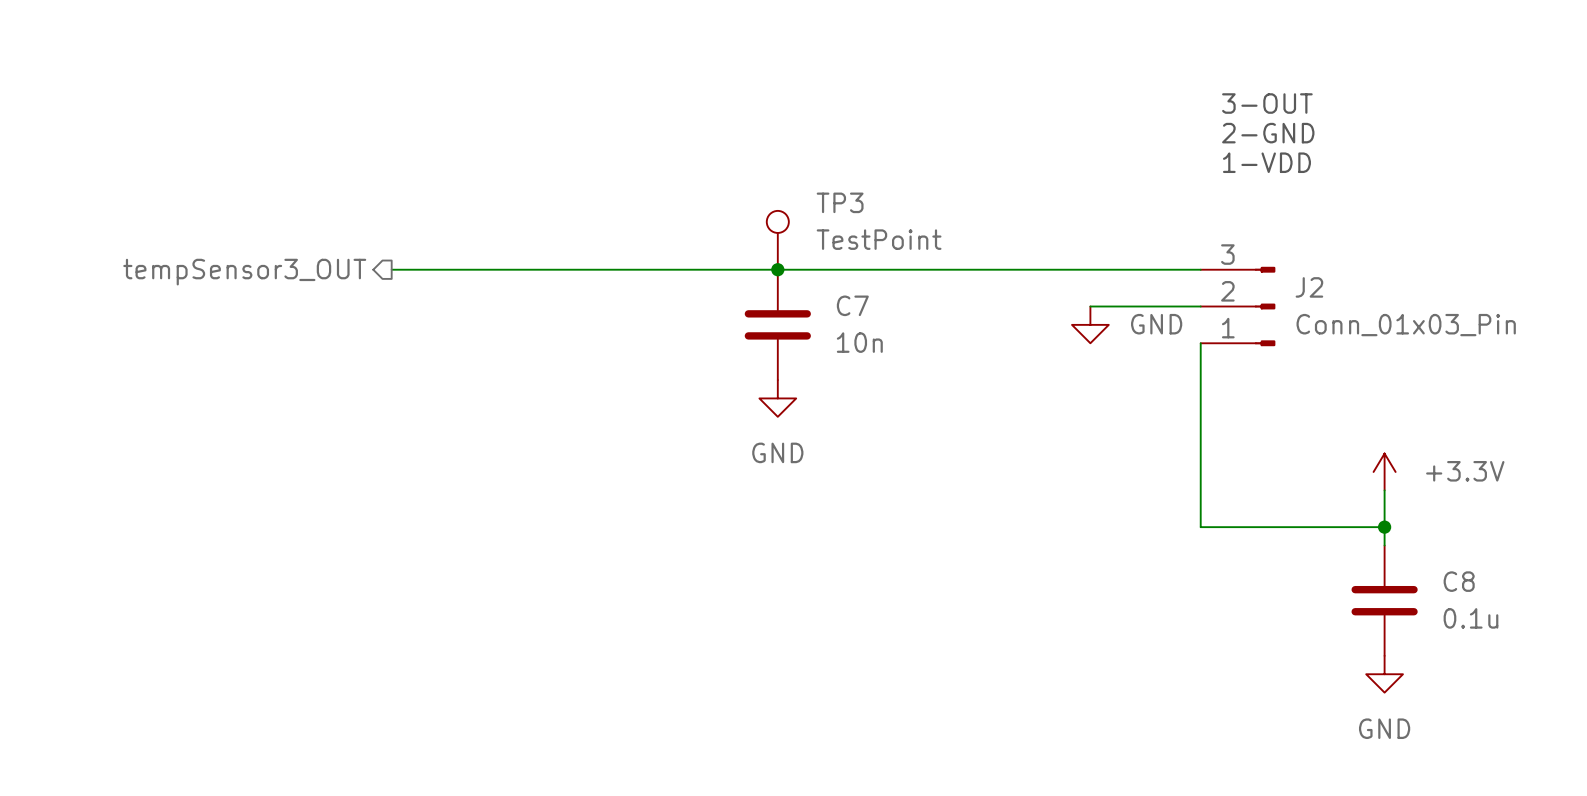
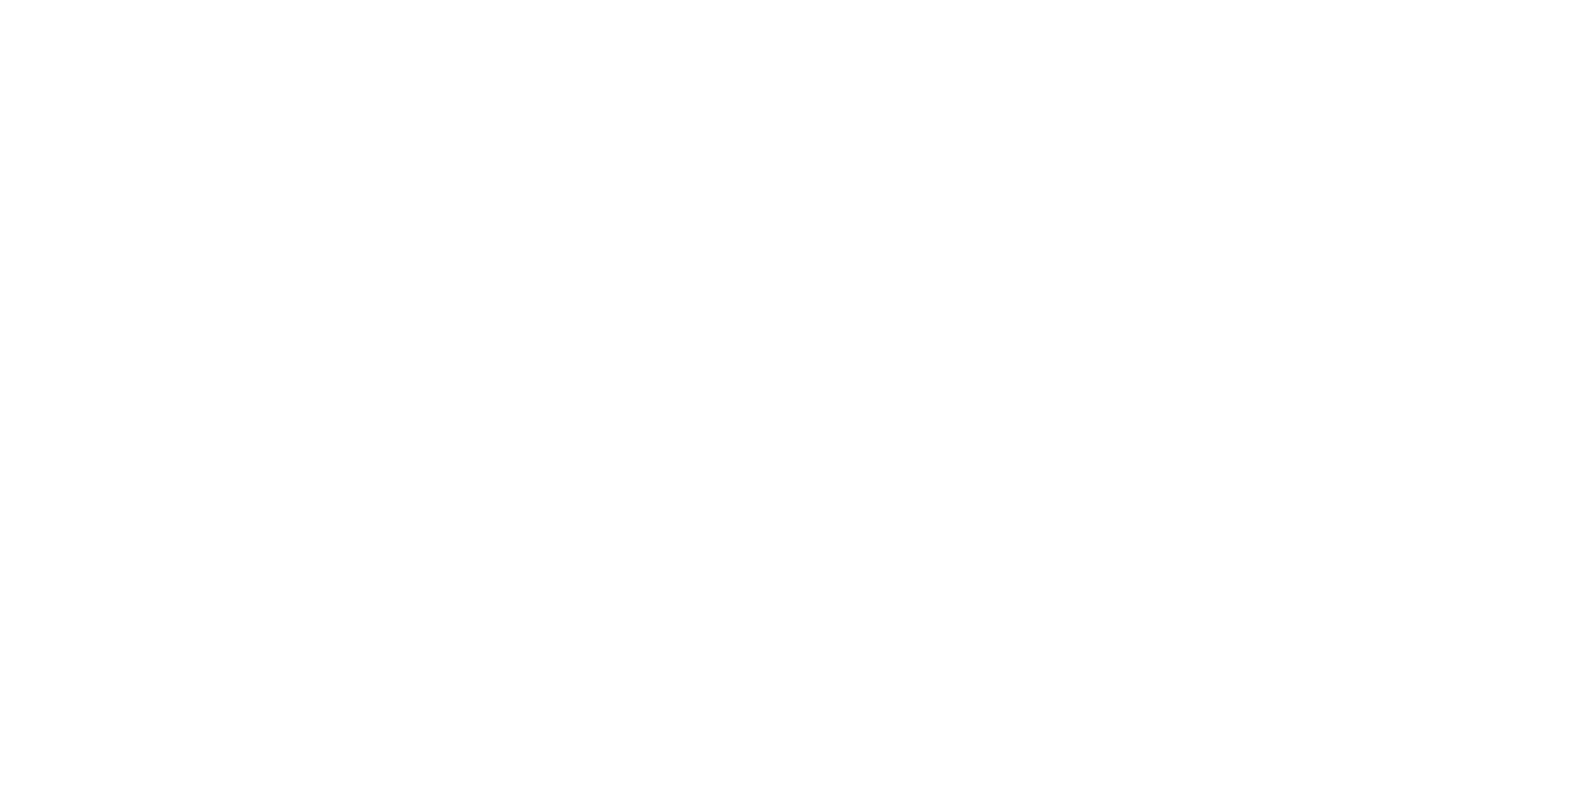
text: 3-OUT (1267, 103) -> none
text: 2-GND (1268, 133) -> none
text: 1-VDD (1266, 162) -> none
TP3: TestPoint (777, 240) -> none
wire: (391, 269) (1200, 269) -> none
junction: (777, 269) -> none
hierarchical label: tempSensor3_OUT (244, 272) -> none
wire: (1090, 306) (1200, 306) -> none
J2: Conn_01x03_Pin (1238, 306) -> none
C7: 10n (777, 324) -> none
power symbol: GND (1090, 324) -> none
wire: (1200, 343) (1200, 527) (1384, 527) -> none
power symbol: GND (777, 398) -> none
power symbol: +3.3V (1384, 471) -> none
wire: (1384, 490) (1384, 545) -> none
junction: (1384, 527) -> none
C8: 0.1u (1384, 600) -> none
power symbol: GND (1384, 674) -> none

